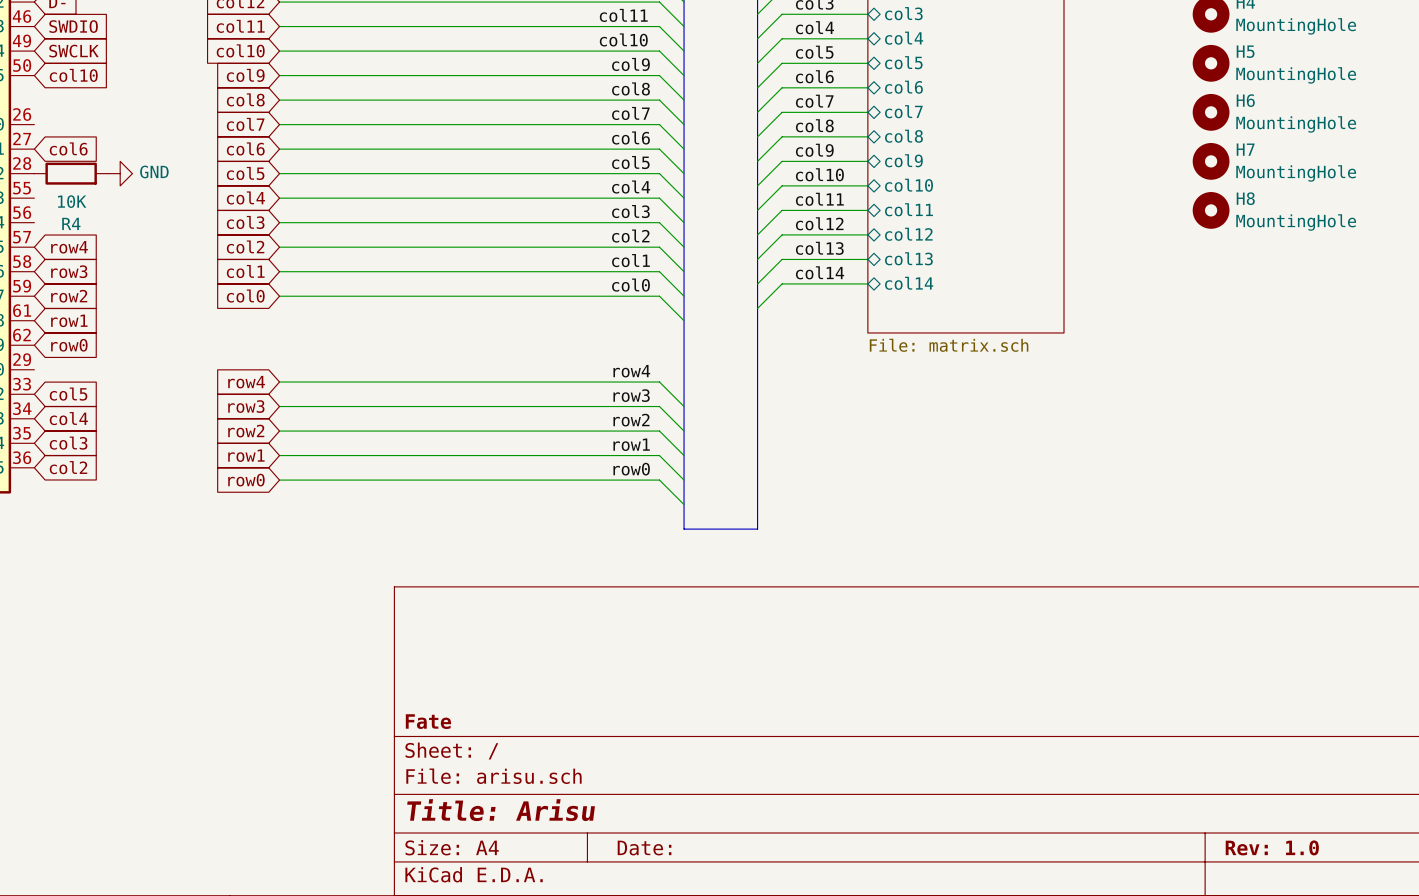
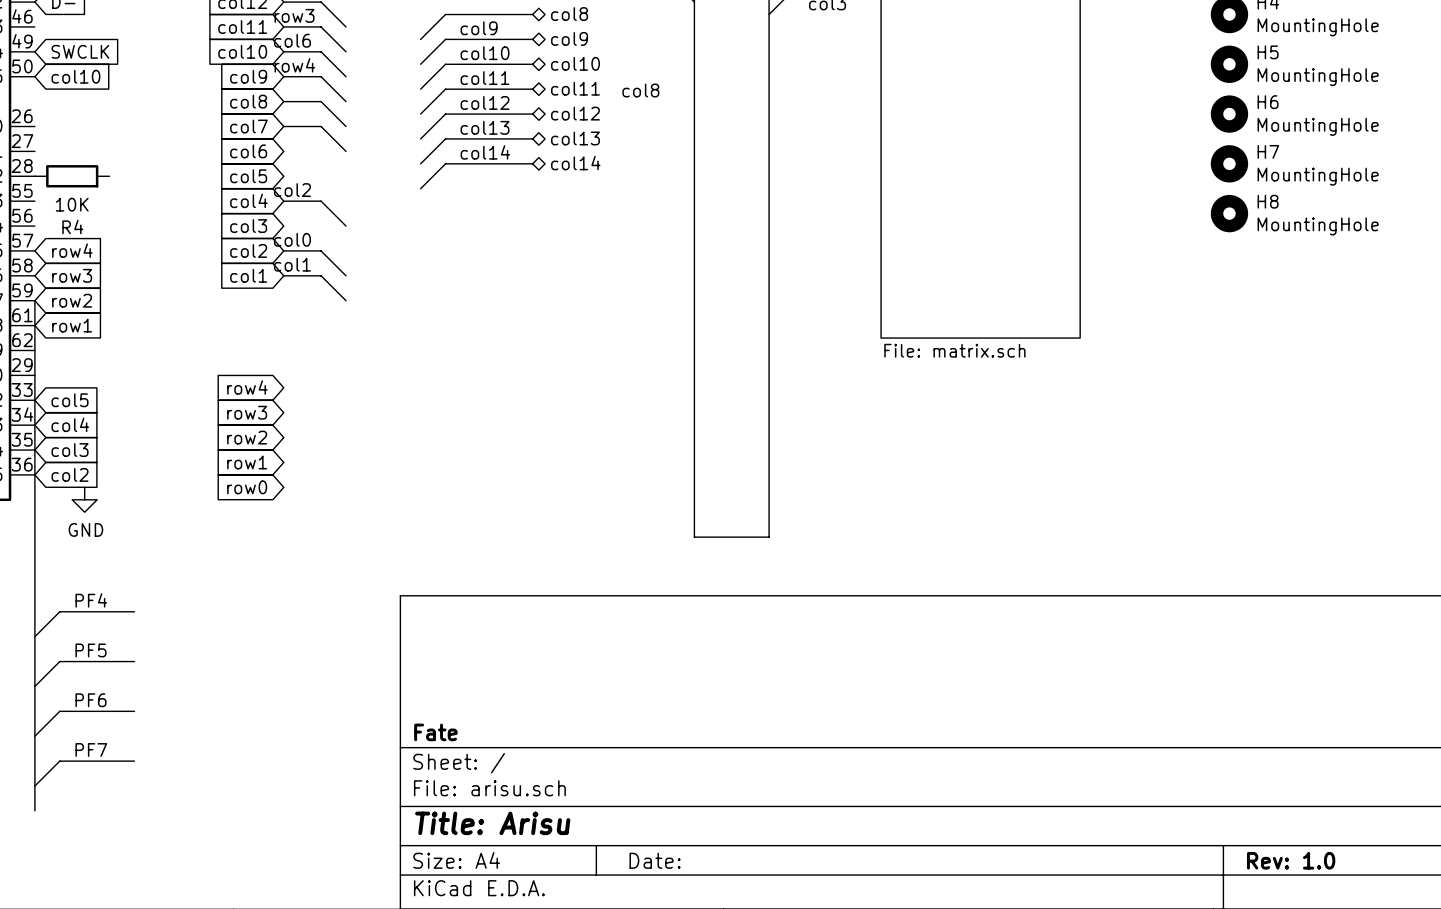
wire: (316, 2) (659, 2) (684, 26) -> (321, 2) (345, 26)
sheet pin: none -> col8 (569, 14)
sheet pin: col3 (903, 13) -> none
wire: none -> (532, 14) (445, 14) (420, 39)
wire: (867, 14) (782, 14) (757, 38) -> none
label: none -> row3 (294, 15)
label position: col11 (623, 15) -> col11 (485, 78)
global label: SWDIO (73, 26) -> none
wire: (316, 26) (659, 26) (684, 51) -> (321, 26) (345, 51)
label: col4 (814, 27) -> none
wire: none -> (532, 39) (445, 39) (420, 64)
sheet pin: none -> col9 (569, 38)
wire: (867, 38) (782, 38) (757, 63) -> none
sheet pin: col4 (904, 38) -> none
label: none -> col6 (292, 40)
label position: col10 (623, 39) -> col10 (485, 53)
wire: (316, 51) (659, 51) (684, 75) -> (321, 51) (345, 76)
label: col5 (814, 52) -> none
sheet pin: none -> col10 (575, 63)
sheet pin: col5 (903, 62) -> none
wire: none -> (532, 64) (445, 64) (420, 89)
wire: (867, 63) (782, 63) (757, 87) -> none
label: none -> row4 (294, 65)
label position: col9 (630, 64) -> col9 (479, 28)
wire: (316, 75) (659, 75) (684, 100) -> (321, 76) (345, 101)
label: col6 (814, 76) -> none
wire: none -> (532, 89) (445, 89) (420, 114)
sheet pin: none -> col11 (575, 88)
wire: (867, 87) (782, 87) (757, 112) -> none
sheet pin: col6 (903, 87) -> none
wire: (316, 100) (659, 100) (684, 124) -> (321, 101) (345, 126)
label: none -> col12 (485, 102)
label: col7 (814, 101) -> none
sheet pin: none -> col12 (575, 113)
sheet pin: col7 (903, 111) -> none
wire: none -> (532, 114) (445, 114) (420, 138)
wire: (867, 112) (782, 112) (757, 136) -> none
label: col7 (630, 113) -> none
wire: (316, 124) (659, 124) (684, 149) -> (321, 126) (345, 151)
label: none -> col13 (485, 127)
label: col8 (814, 125) -> none
wire: none -> (532, 138) (445, 138) (420, 163)
sheet pin: none -> col13 (575, 138)
wire: (867, 136) (782, 136) (757, 161) -> none
sheet pin: col8 (903, 136) -> none
label: col6 (630, 138) -> none
global label: col6 (68, 148) -> none
wire: (279, 149) (659, 149) (684, 173) -> none
label: none -> col14 (485, 152)
label: col9 (814, 150) -> none
sheet pin: none -> col14 (575, 163)
sheet pin: col9 (903, 160) -> none
wire: none -> (532, 163) (445, 163) (420, 188)
wire: (867, 161) (782, 161) (757, 185) -> none
label: col5 (630, 162) -> none
power symbol: GND (120, 173) -> none
wire: (279, 173) (659, 173) (684, 198) -> none
label: col10 (819, 174) -> none
wire: (867, 185) (782, 185) (757, 210) -> none
sheet pin: col10 (909, 185) -> none
label: none -> col2 (292, 190)
label: col4 (631, 187) -> none
wire: (316, 198) (659, 198) (684, 222) -> (321, 201) (345, 226)
label: col11 (819, 199) -> none
sheet pin: col11 (908, 209) -> none
wire: (867, 210) (782, 210) (757, 234) -> none
label: col3 (630, 211) -> none
wire: (279, 222) (659, 222) (684, 247) -> none
label: col12 (819, 223) -> none
wire: (867, 234) (782, 234) (757, 259) -> none
sheet pin: col12 (908, 234) -> none
label: none -> col0 (292, 239)
label: col2 (630, 236) -> none
wire: (316, 247) (659, 247) (684, 271) -> (321, 250) (345, 275)
label: col13 (819, 248) -> none
sheet pin: col13 (908, 258) -> none
wire: (867, 259) (782, 259) (757, 283) -> none
label: none -> col1 (292, 264)
label: col1 (630, 260) -> none
wire: (316, 271) (659, 271) (684, 296) -> (321, 275) (345, 300)
label: col14 (820, 272) -> none
wire: (867, 283) (782, 283) (757, 308) -> none
sheet pin: col14 (909, 283) -> none
label: col0 (630, 285) -> none
bus: none -> (34, 300) (34, 810)
global label: col0 (245, 296) -> none
wire: (279, 296) (659, 296) (684, 320) -> none
global label: row0 (69, 345) -> none
label: row4 (631, 371) -> none
wire: (279, 382) (659, 382) (684, 406) -> none
label: row3 (631, 395) -> none
wire: (279, 406) (659, 406) (684, 431) -> none
label: row2 (631, 420) -> none
wire: (279, 431) (659, 431) (684, 455) -> none
label: row1 (631, 444) -> none
wire: (279, 455) (659, 455) (684, 480) -> none
label: row0 (631, 469) -> none
wire: (279, 480) (659, 480) (684, 504) -> none
power symbol: none -> GND (84, 499)
label: none -> PF4 (91, 600)
wire: none -> (134, 611) (59, 611) (34, 636)
label: none -> PF5 (91, 650)
wire: none -> (134, 661) (59, 661) (34, 686)
label: none -> PF6 (91, 700)
wire: none -> (134, 711) (59, 711) (34, 736)
label: none -> PF7 (91, 750)
wire: none -> (134, 761) (59, 761) (34, 786)

